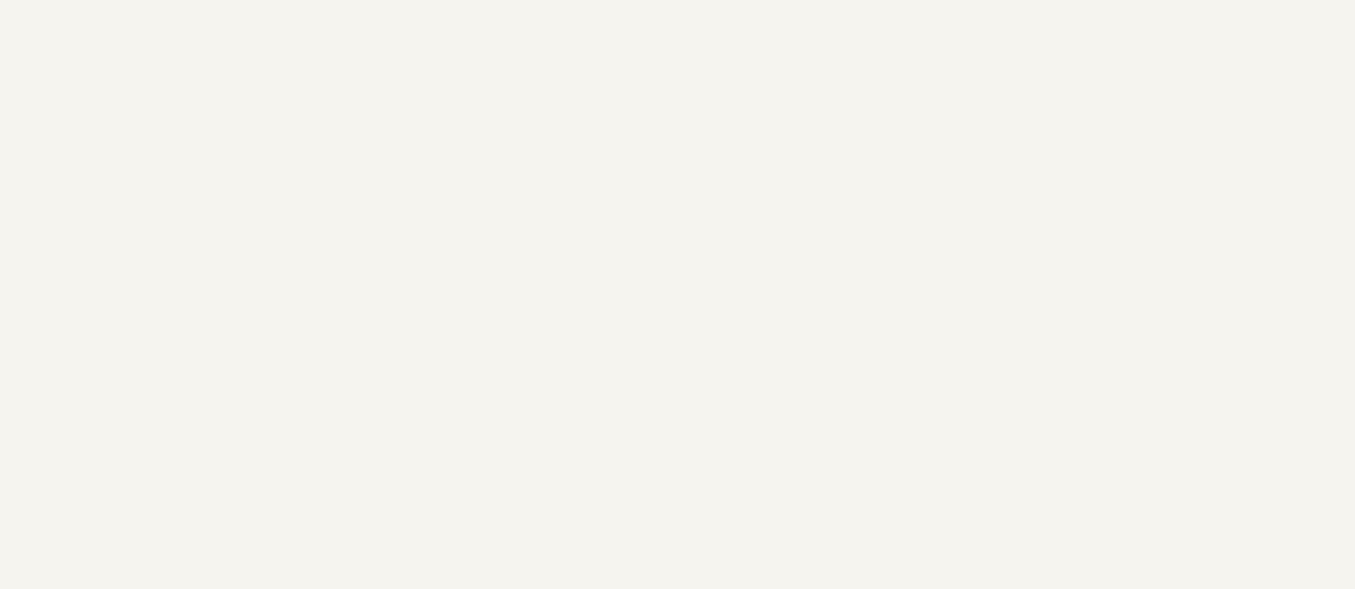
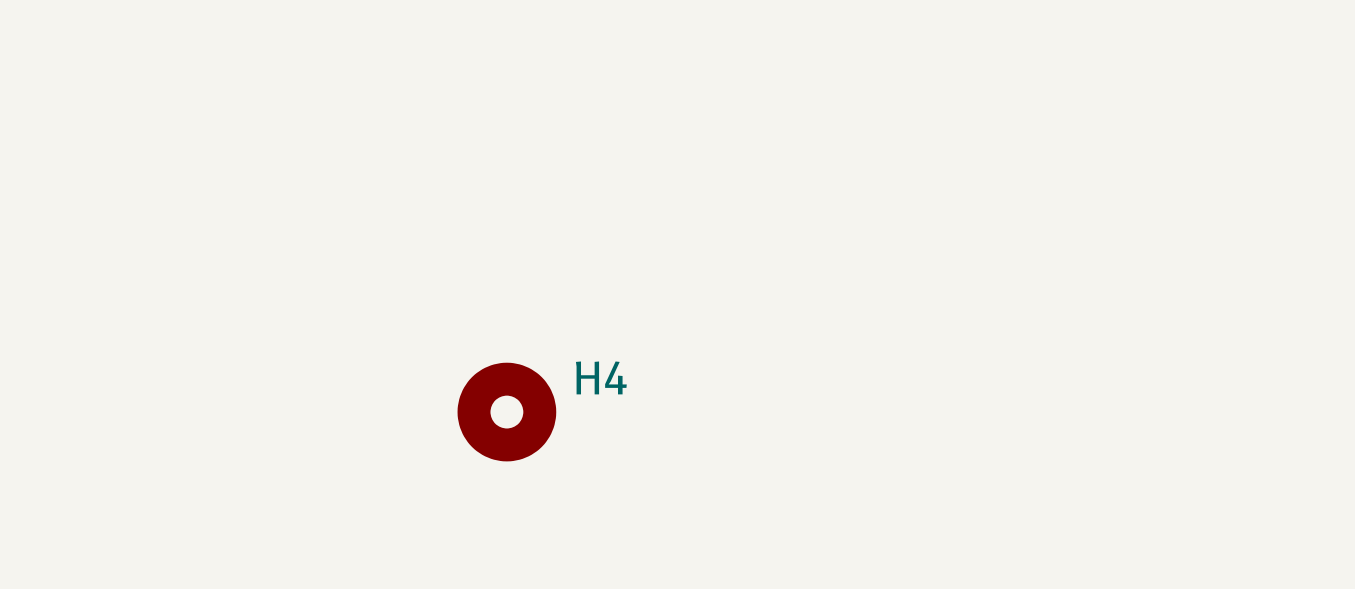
H4: none -> (506, 412)

